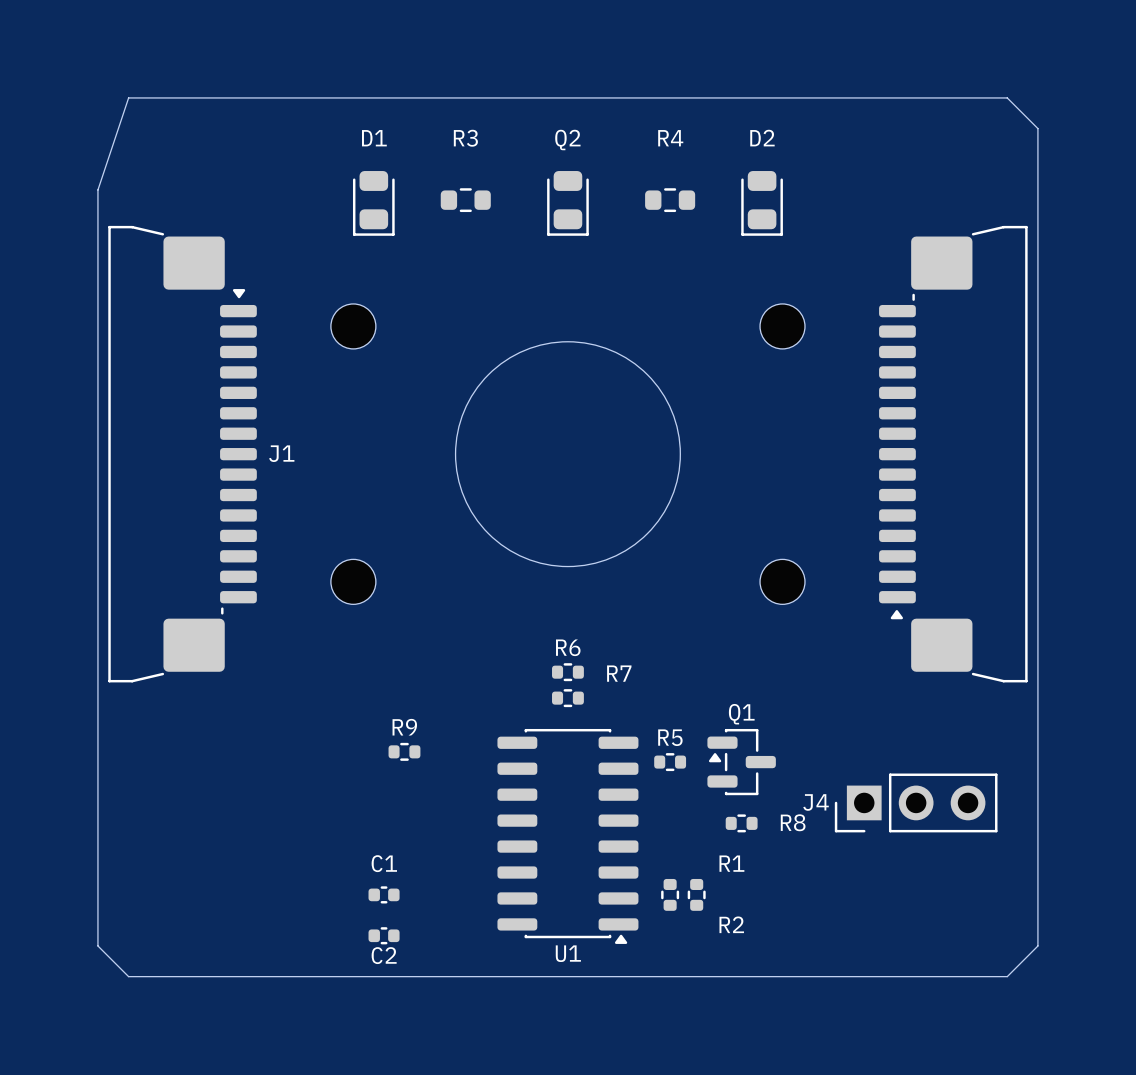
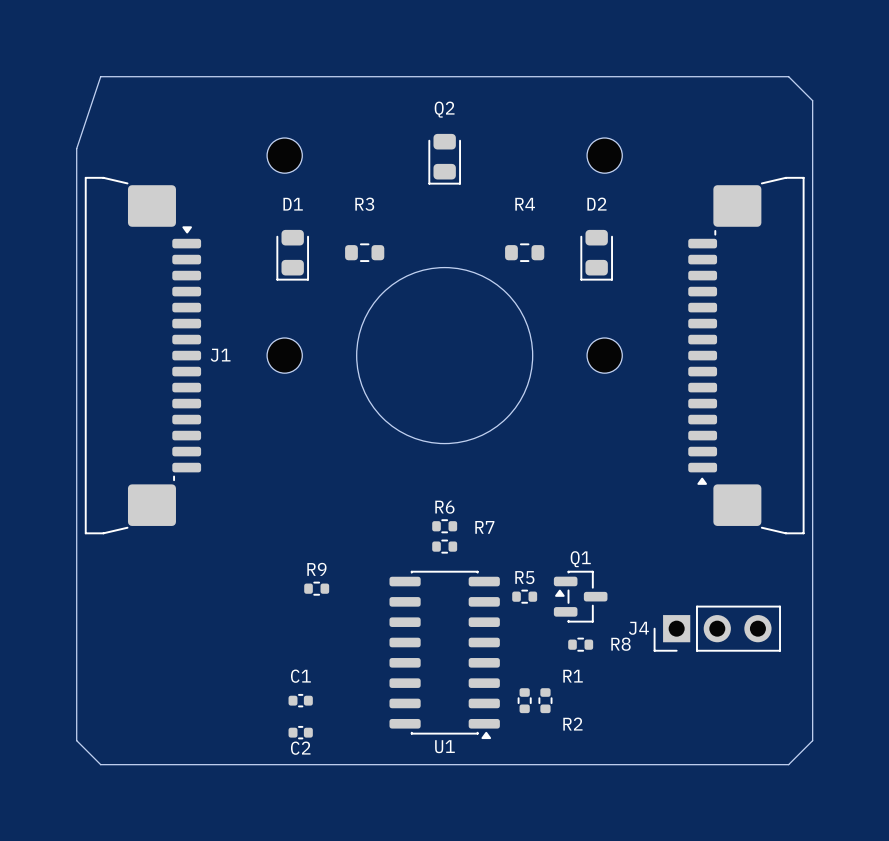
part: none -> (284, 155)
part: none -> (604, 155)
R3 position: (465, 200) -> (364, 252)
R4 position: (670, 200) -> (524, 252)
D1 position: (373, 203) -> (292, 255)
D2 position: (762, 203) -> (596, 255)
part: (353, 326) -> none
part: (782, 326) -> none
part: none -> (284, 355)
part: none -> (604, 355)
part: (353, 581) -> none
part: (782, 581) -> none

